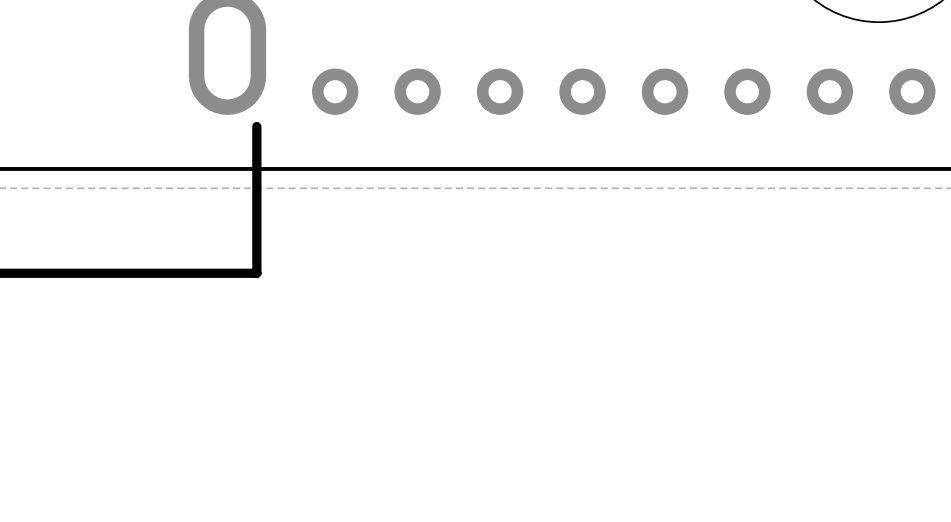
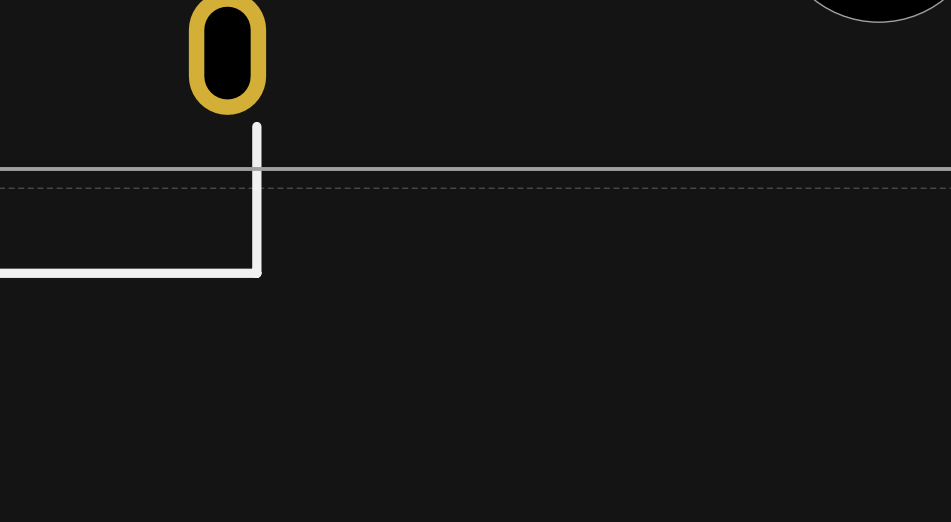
via: (335, 91) -> none
via: (417, 91) -> none
via: (500, 91) -> none
via: (582, 91) -> none
via: (664, 91) -> none
via: (747, 91) -> none
via: (829, 91) -> none
via: (912, 91) -> none

